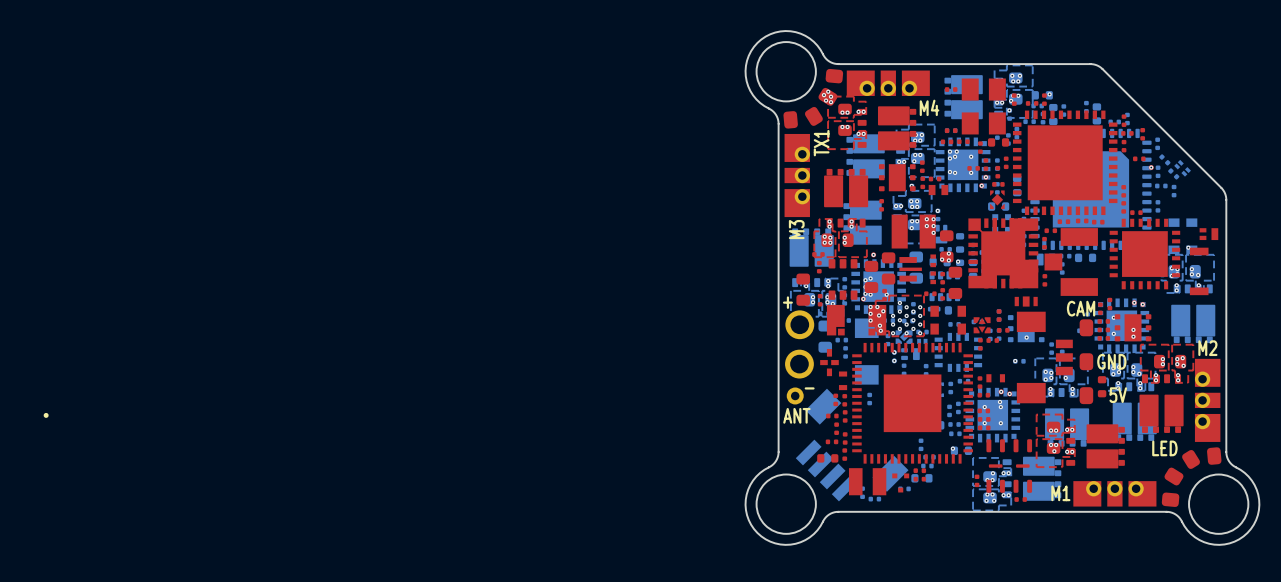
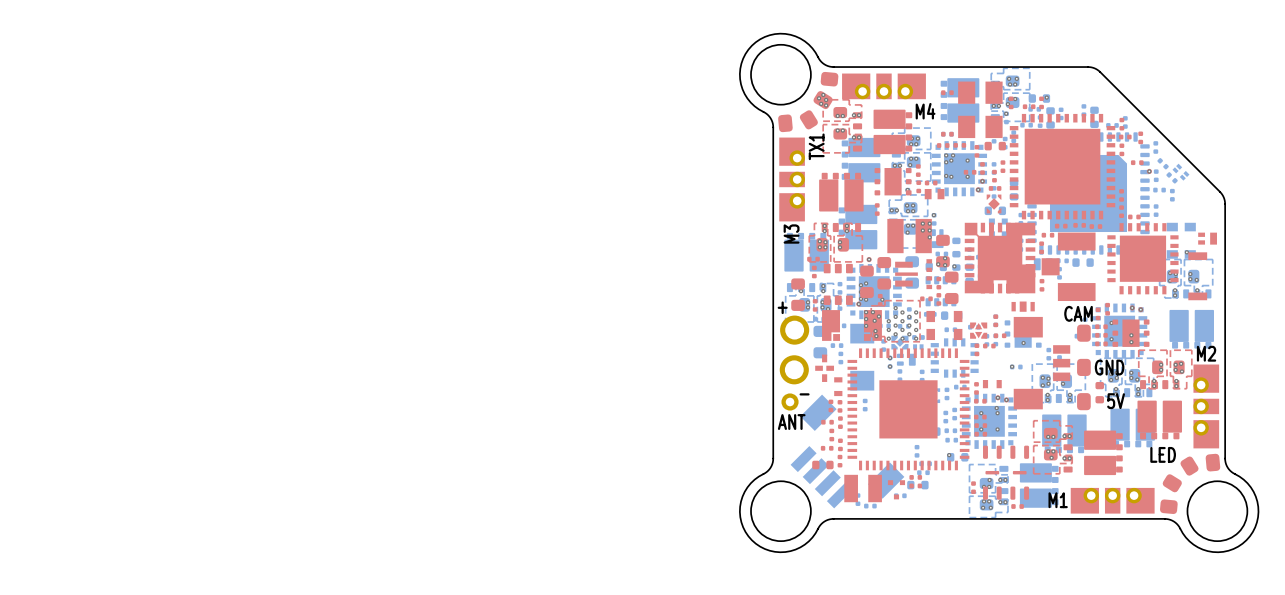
drawing: [43, 412, 49, 418] -> none

